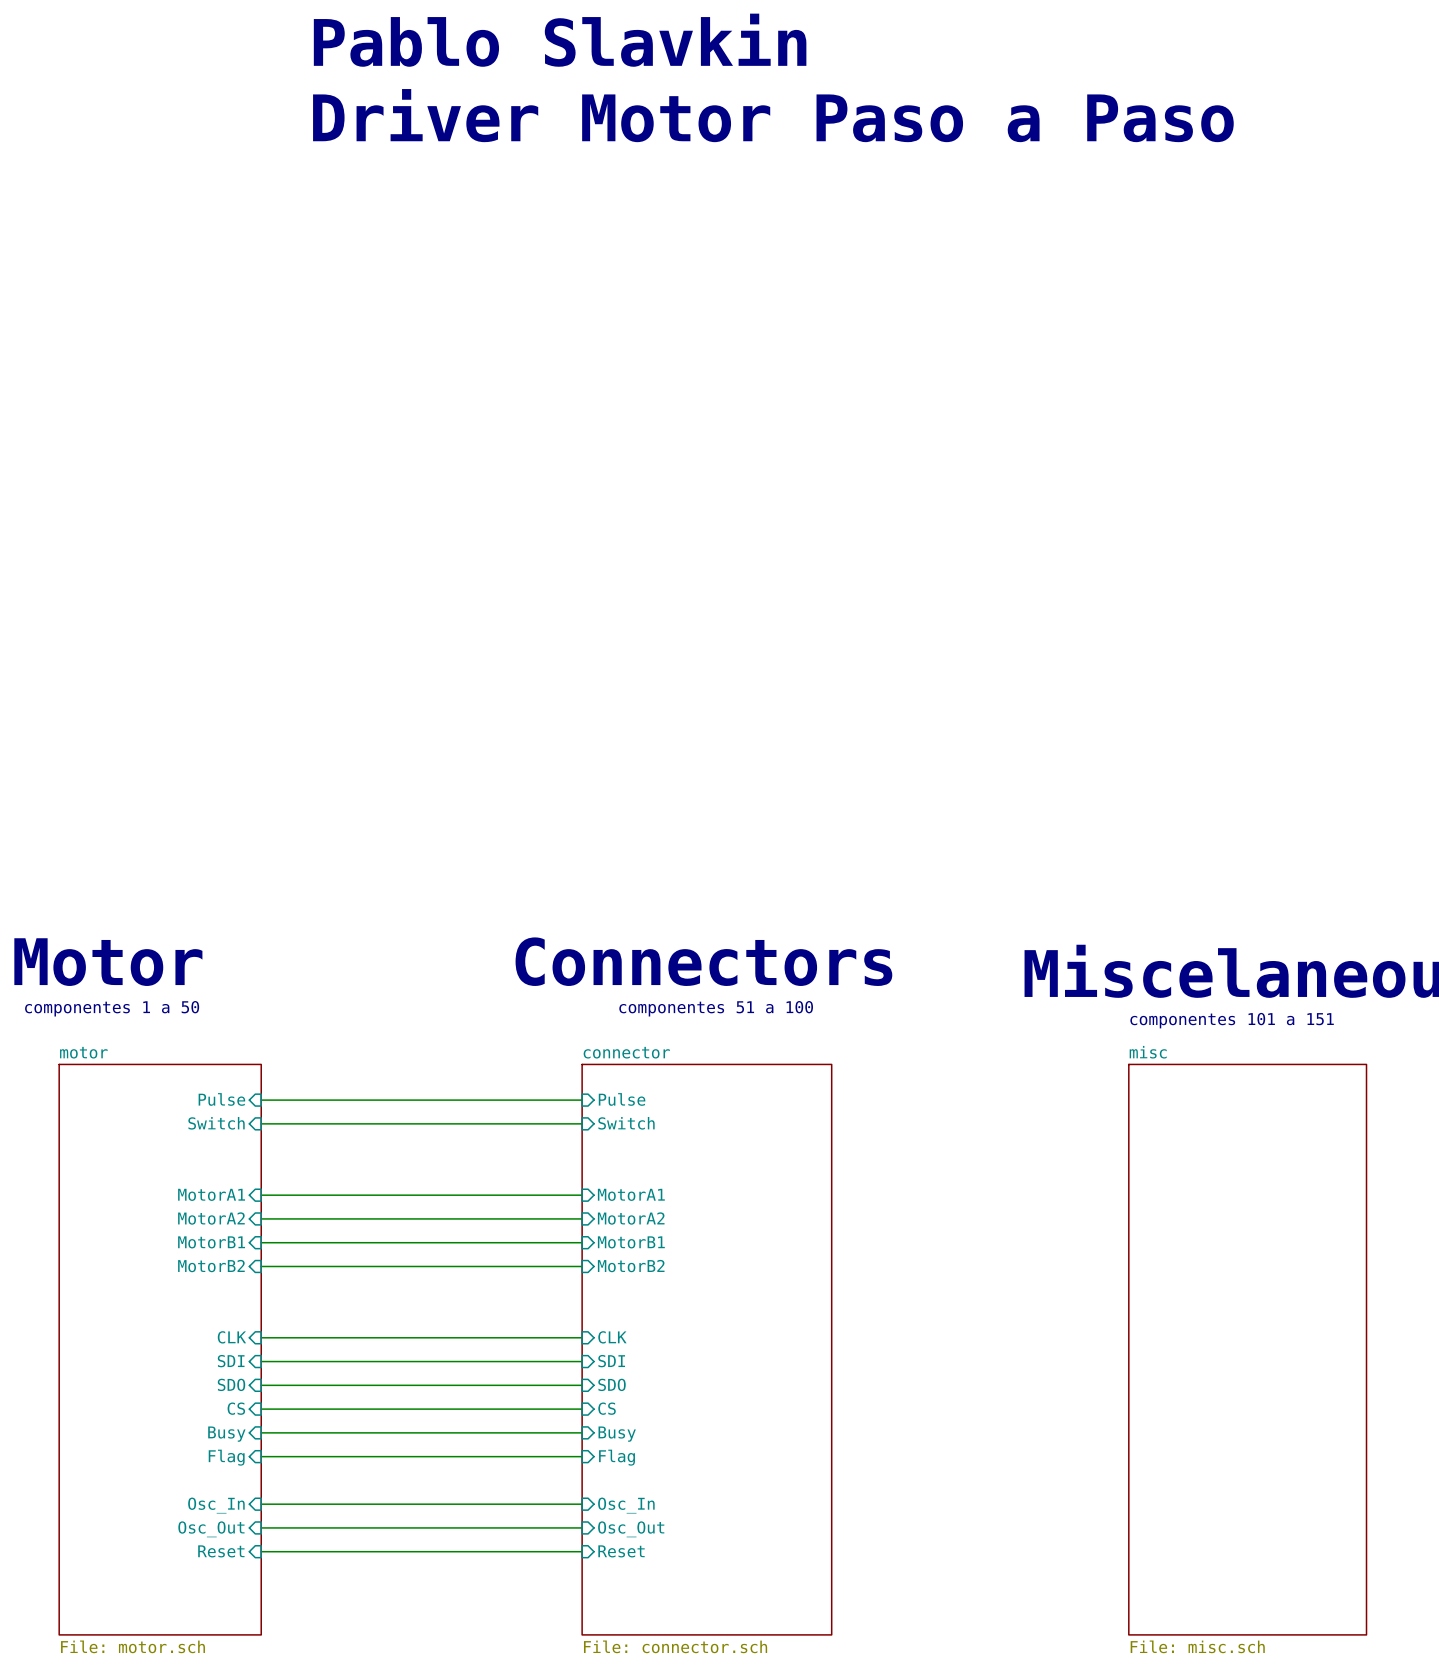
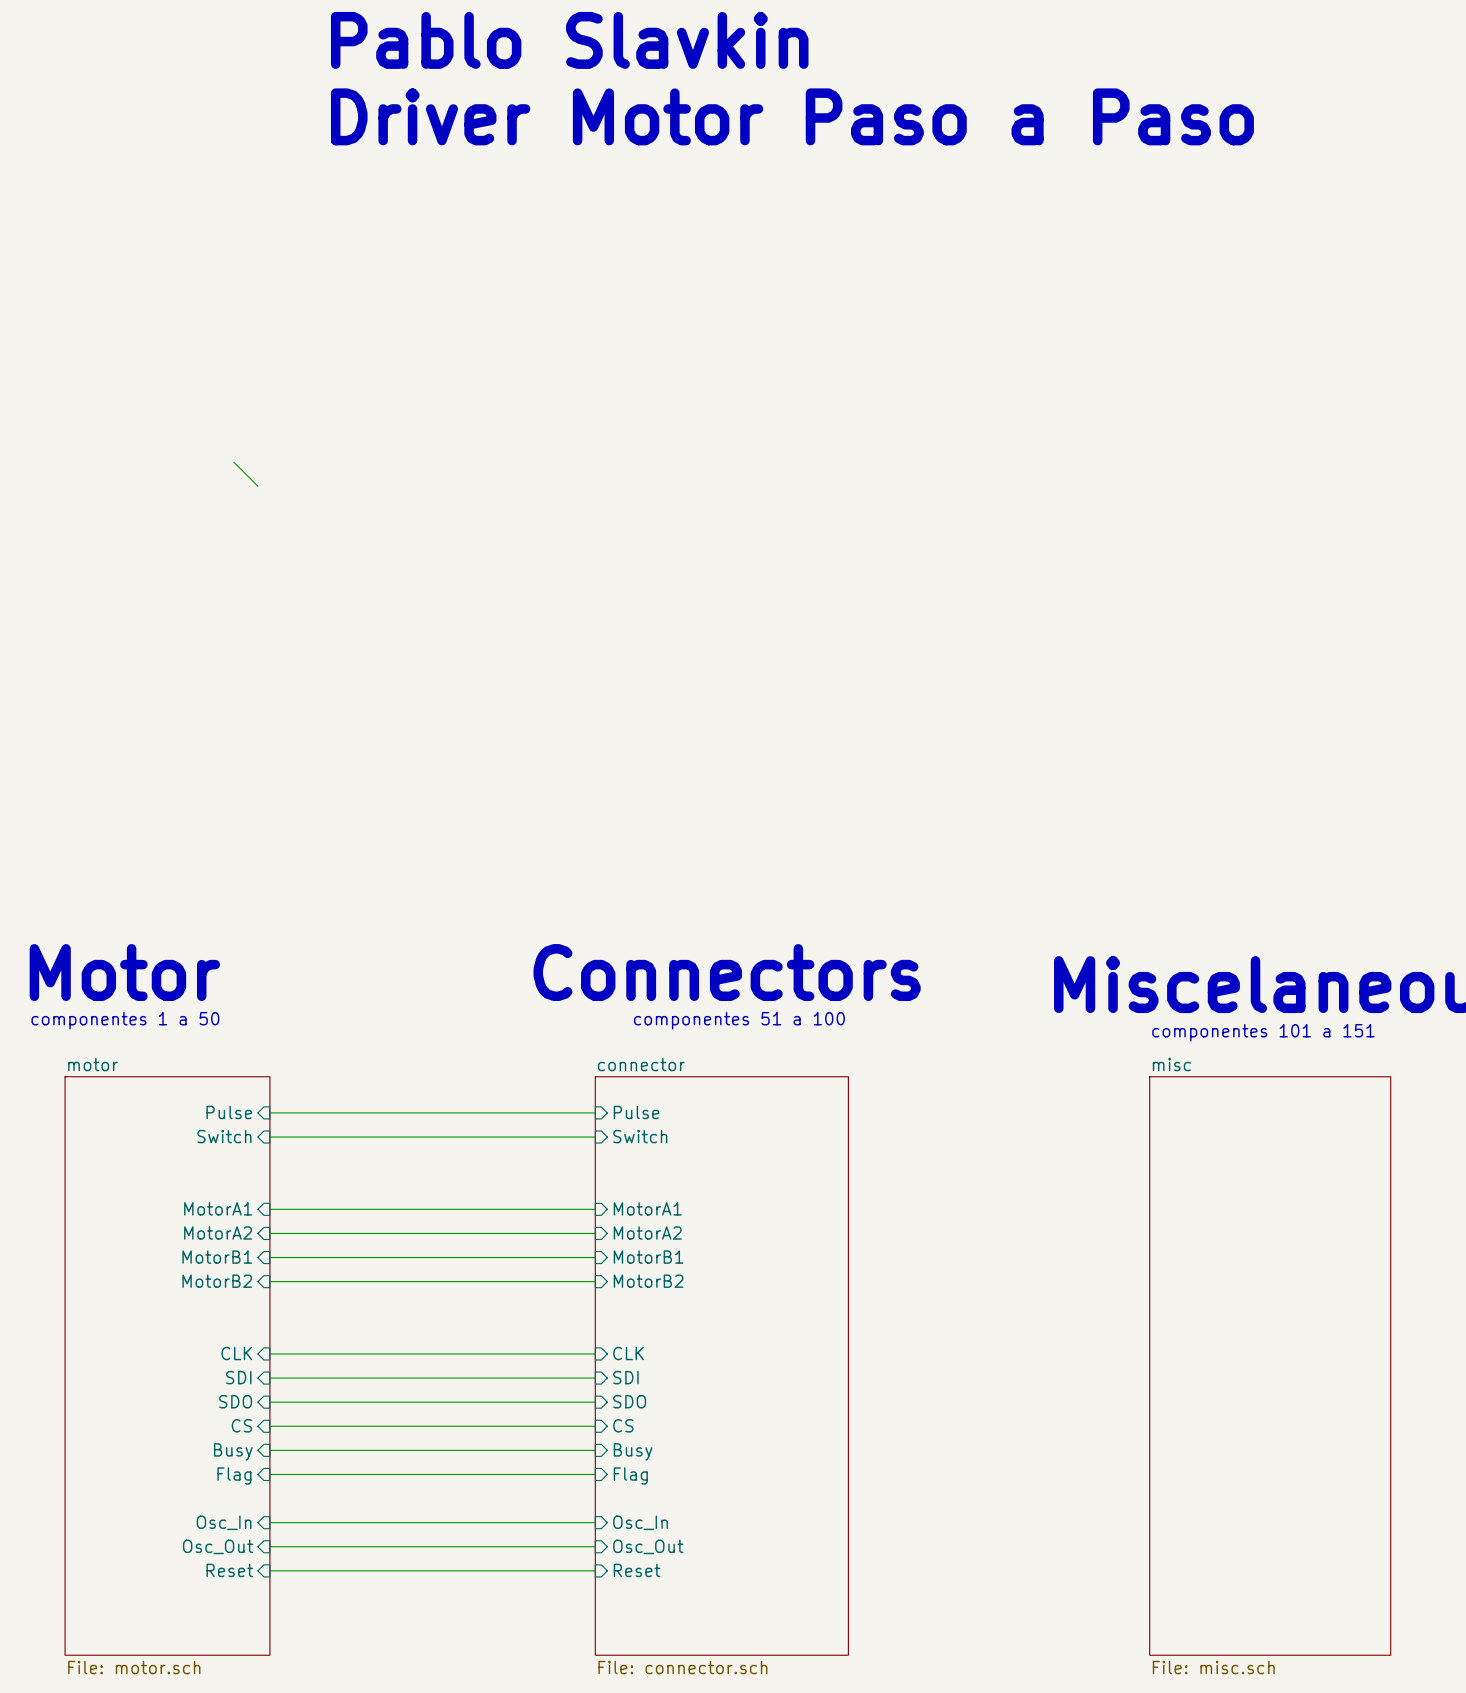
wire: none -> (233, 462) (257, 486)

